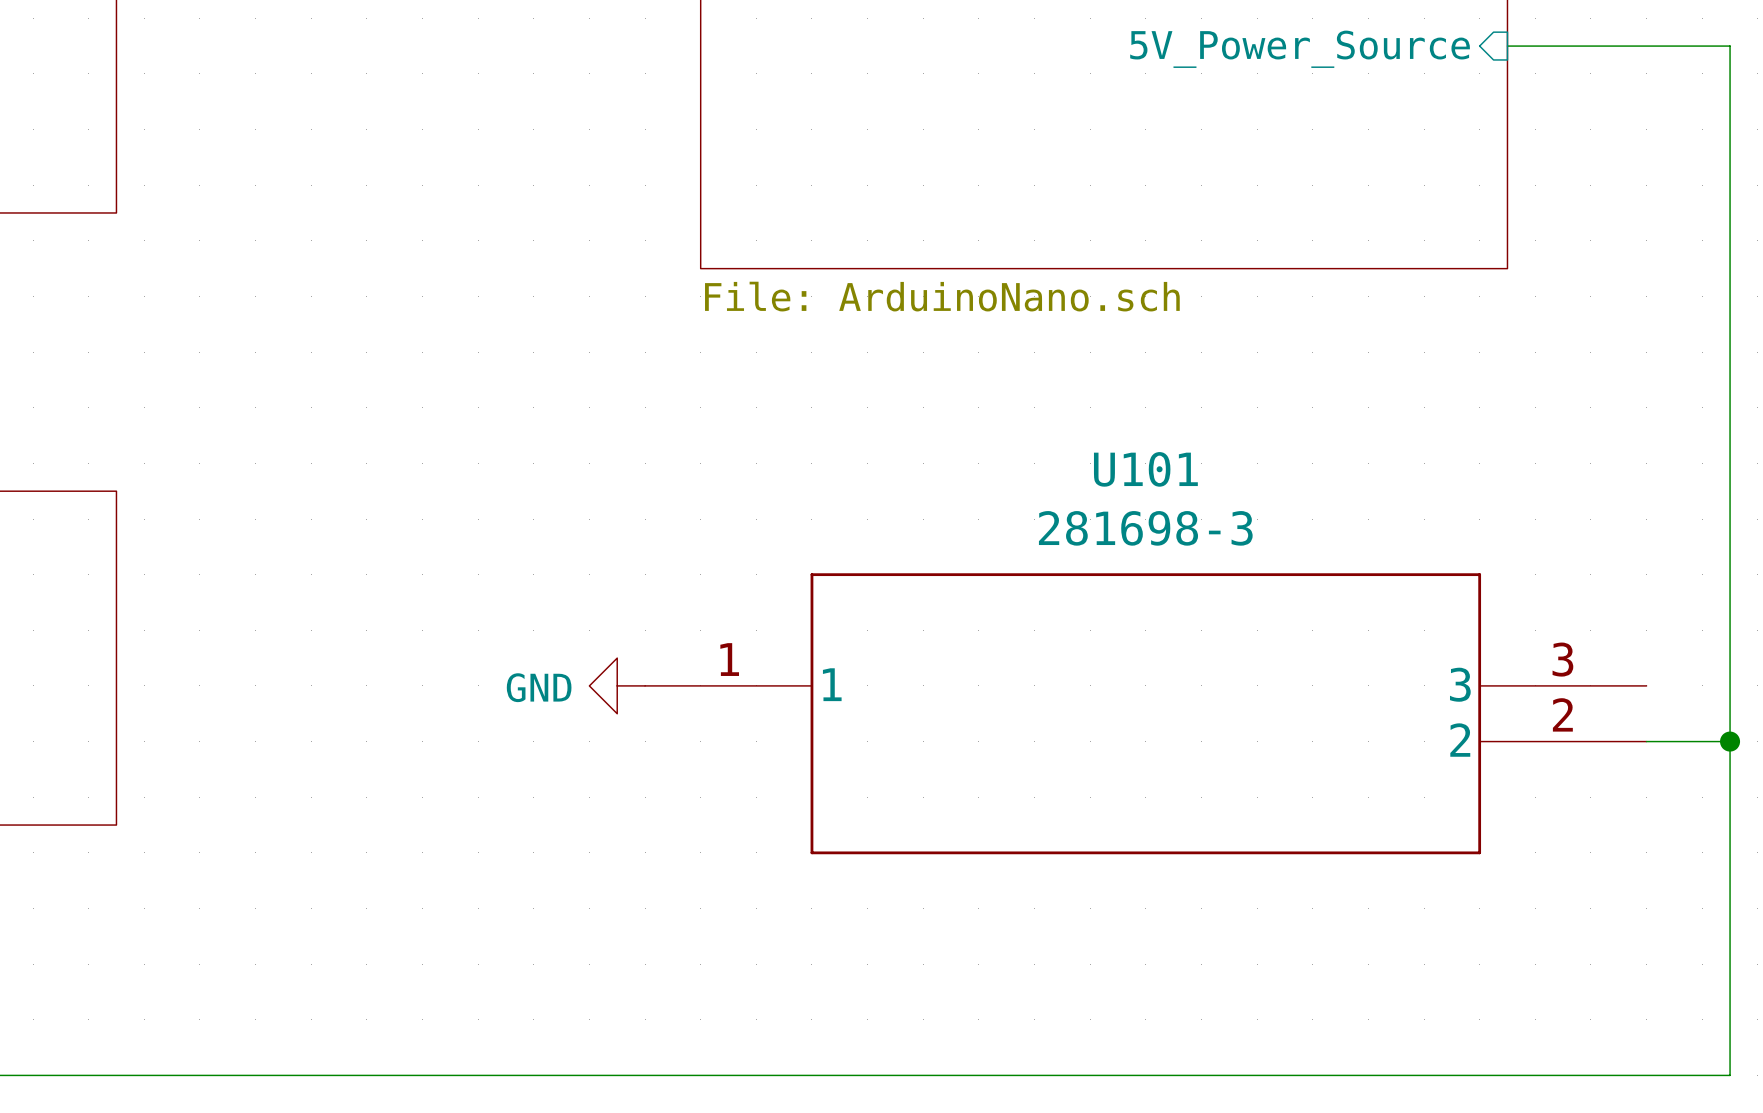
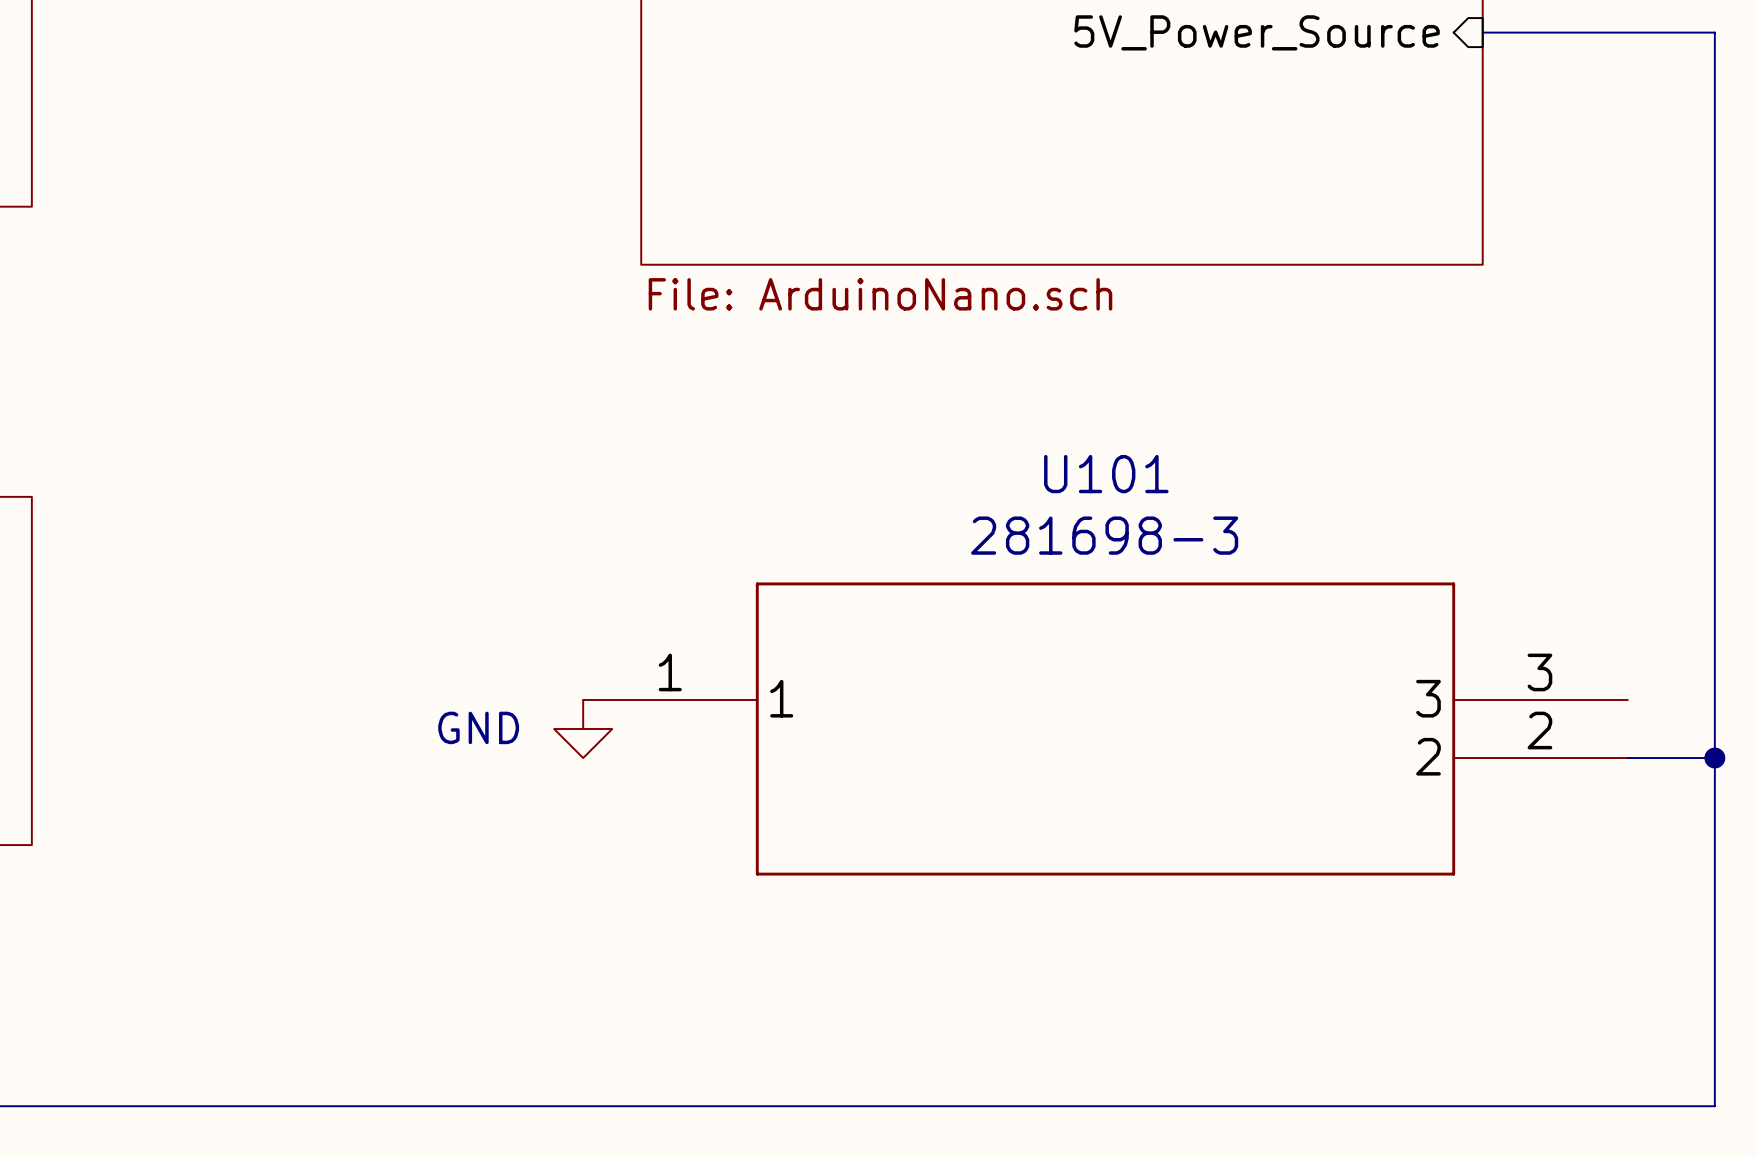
power symbol rotation: 0° (617, 685) -> 90° counterclockwise (583, 729)
power symbol position: GND (617, 685) -> GND (583, 729)

